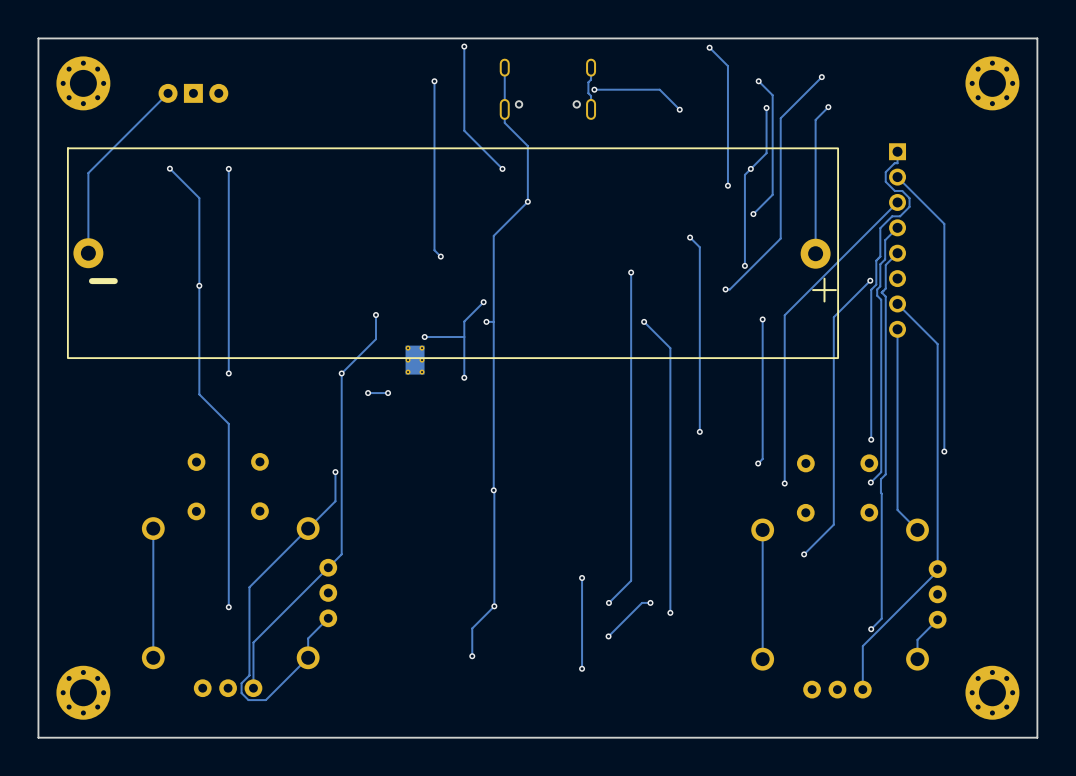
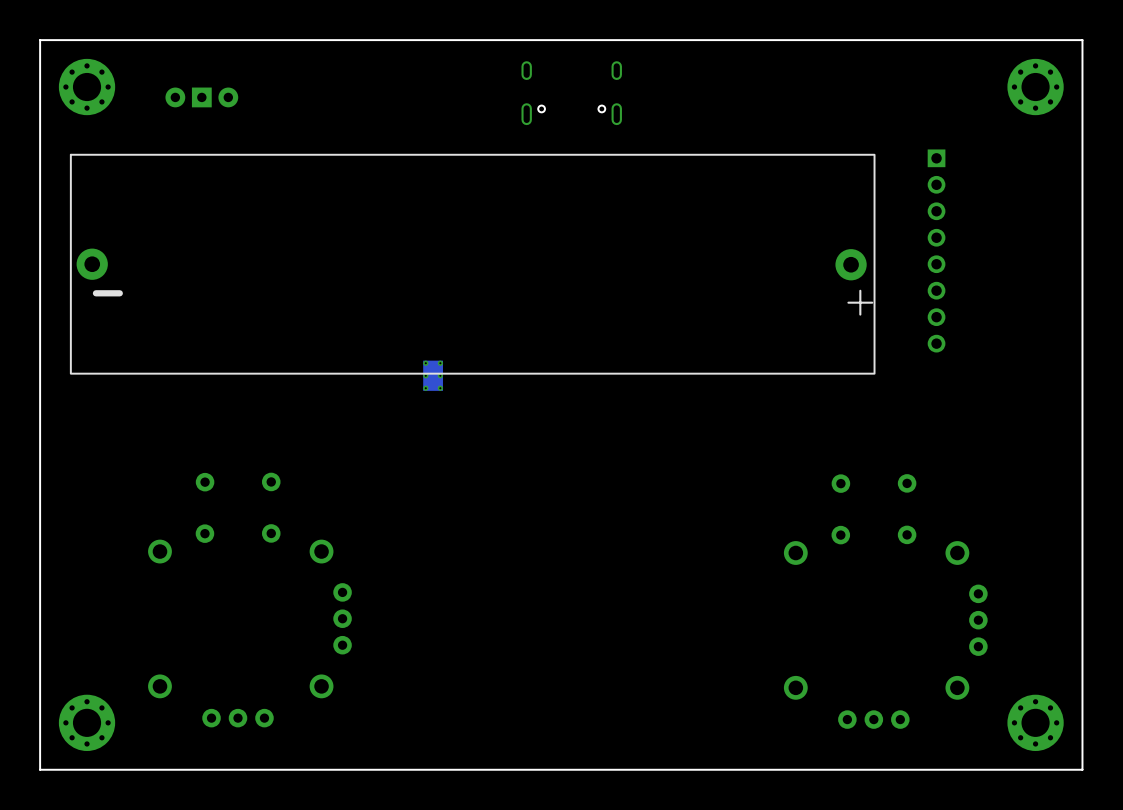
track: (464, 46) (464, 130) (502, 168) -> none
via: (464, 46) -> none
track: (709, 47) (727, 66) (727, 185) -> none
via: (709, 47) -> none
track: (504, 67) (504, 122) (527, 146) (527, 201) (493, 235) (494, 606) (472, 628) (472, 656) -> none
track: (591, 67) (591, 79) (588, 82) (591, 109) -> none
track: (821, 77) (780, 118) (780, 238) (729, 289) (725, 289) -> none
via: (821, 77) -> none
track: (434, 81) (434, 250) (440, 256) -> none
via: (434, 81) -> none
track: (758, 81) (772, 95) (772, 194) (753, 214) -> none
via: (758, 81) -> none
track: (594, 89) (659, 89) (679, 109) -> none
via: (594, 89) -> none
track: (168, 93) (88, 173) (88, 253) -> none
track: (766, 107) (766, 153) (744, 174) (744, 265) -> none
via: (766, 107) -> none
track: (828, 107) (815, 119) (815, 253) -> none
via: (828, 107) -> none
via: (679, 109) -> none
track: (897, 151) (897, 163) (894, 163) (885, 172) (885, 181) (894, 190) (902, 190) (909, 198) (909, 206) (900, 216) (892, 216) (880, 228) (880, 256) (876, 260) (876, 284) (871, 289) (871, 439) -> none
track: (169, 168) (199, 198) (199, 394) (228, 423) (228, 607) -> none
via: (169, 168) -> none
track: (228, 168) (228, 373) -> none
via: (228, 168) -> none
via: (502, 168) -> none
via: (750, 168) -> none
track: (897, 177) (944, 223) (944, 451) -> none
via: (727, 185) -> none
via: (527, 201) -> none
track: (897, 202) (784, 315) (784, 483) -> none
via: (753, 214) -> none
track: (897, 227) (885, 240) (885, 259) (880, 264) (880, 286) (877, 289) (877, 295) (881, 299) (881, 472) (870, 482) -> none
track: (690, 237) (699, 247) (699, 431) -> none
via: (690, 237) -> none
track: (897, 253) (885, 264) (885, 288) (881, 292) (885, 296) (885, 474) (880, 479) (881, 618) (871, 629) -> none
via: (440, 256) -> none
via: (744, 265) -> none
track: (631, 272) (631, 580) (608, 602) -> none
via: (631, 272) -> none
track: (870, 280) (833, 317) (833, 524) (804, 554) -> none
via: (870, 280) -> none
via: (199, 285) -> none
via: (725, 289) -> none
track: (483, 302) (464, 321) (464, 377) -> none
via: (483, 302) -> none
track: (897, 303) (937, 344) (937, 571) (862, 646) (862, 689) -> none
track: (375, 315) (375, 339) (341, 373) (341, 554) (253, 642) (253, 688) -> none
via: (375, 315) -> none
track: (762, 319) (762, 459) (758, 463) -> none
via: (762, 319) -> none
via: (486, 321) -> none
track: (493, 321) (486, 321) -> none
track: (644, 321) (670, 348) (670, 612) -> none
via: (644, 321) -> none
track: (897, 329) (897, 509) (917, 529) -> none
via: (424, 337) -> none
track: (464, 337) (424, 337) -> none
via: (228, 373) -> none
via: (341, 373) -> none
via: (464, 377) -> none
via: (368, 393) -> none
track: (388, 393) (368, 393) -> none
via: (388, 393) -> none
via: (699, 431) -> none
via: (871, 439) -> none
via: (944, 451) -> none
via: (758, 463) -> none
track: (335, 472) (335, 501) (249, 587) (249, 675) (241, 683) (241, 693) (248, 700) (265, 700) (308, 657) (308, 638) (328, 618) -> none
via: (335, 472) -> none
via: (870, 482) -> none
via: (784, 483) -> none
via: (493, 490) -> none
track: (153, 528) (153, 657) -> none
track: (762, 529) (762, 659) -> none
via: (804, 554) -> none
track: (582, 577) (582, 668) -> none
via: (582, 577) -> none
via: (608, 602) -> none
track: (650, 602) (642, 602) (608, 636) -> none
via: (650, 602) -> none
via: (494, 606) -> none
via: (228, 607) -> none
via: (670, 612) -> none
track: (937, 619) (917, 639) (917, 659) -> none
via: (871, 629) -> none
via: (608, 636) -> none
via: (472, 656) -> none
via: (582, 668) -> none

